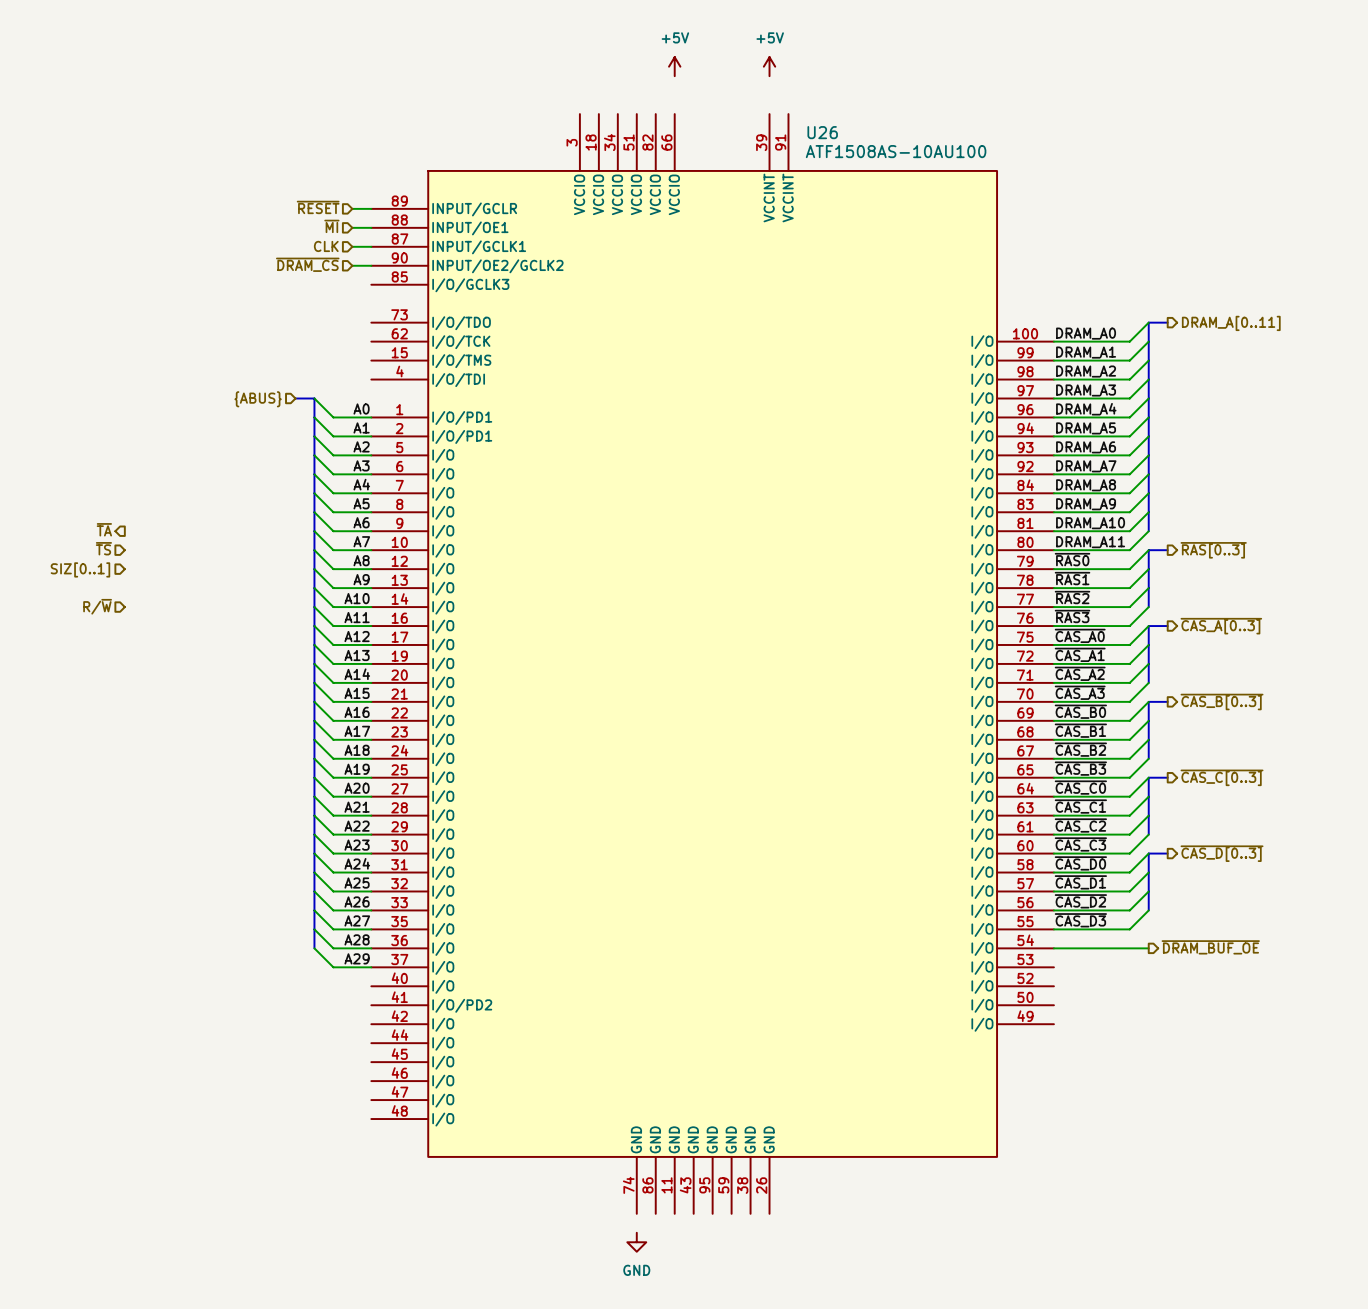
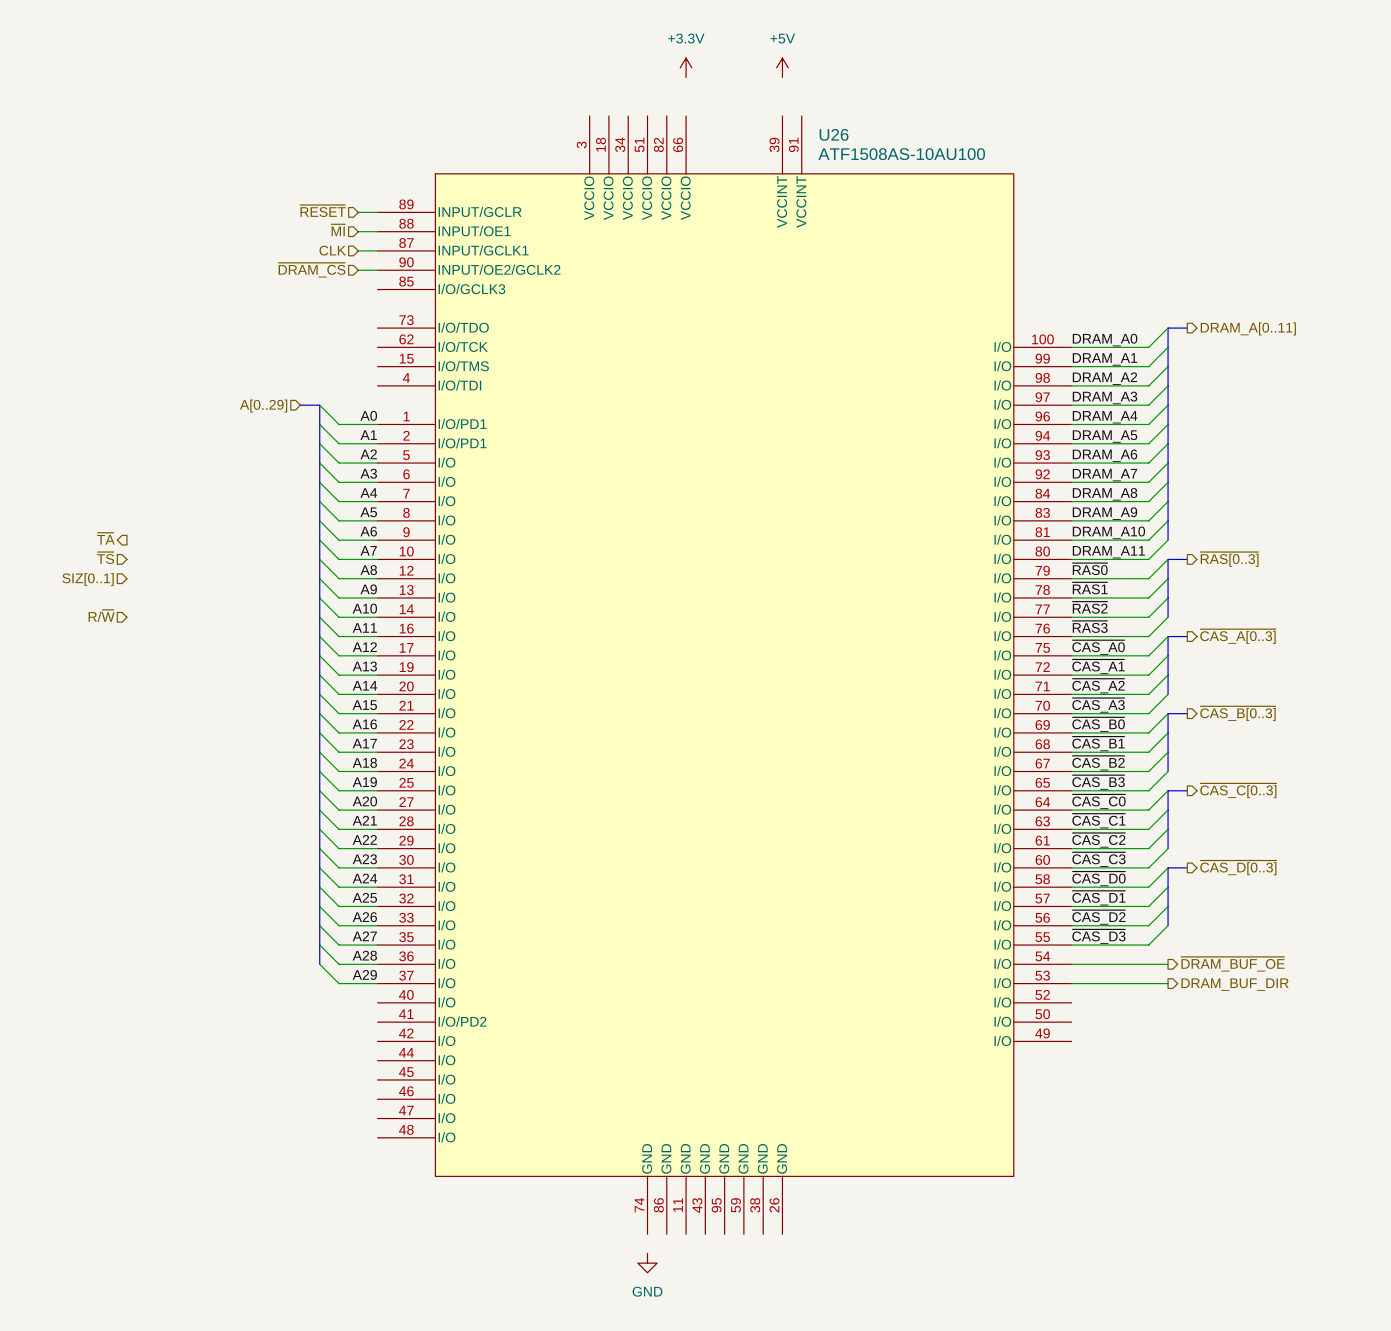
power symbol: +5V (674, 66) -> +3.3V (686, 67)
hierarchical label: {ABUS} (258, 399) -> A[0..29] (263, 406)
wire: none -> (1071, 983) (1168, 983)
hierarchical label: none -> DRAM_BUF_DIR (1235, 984)

